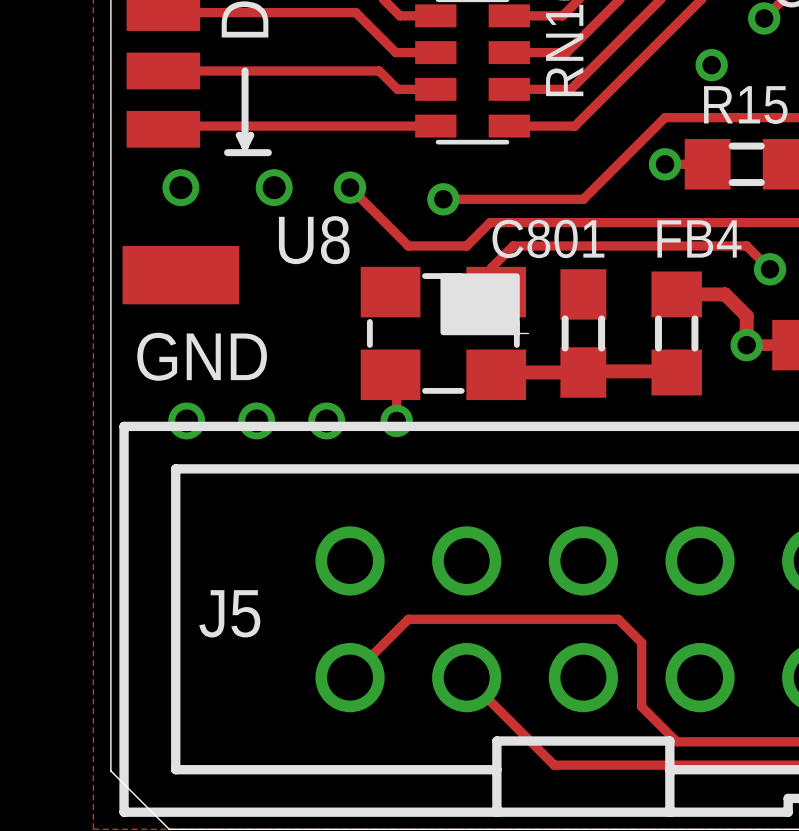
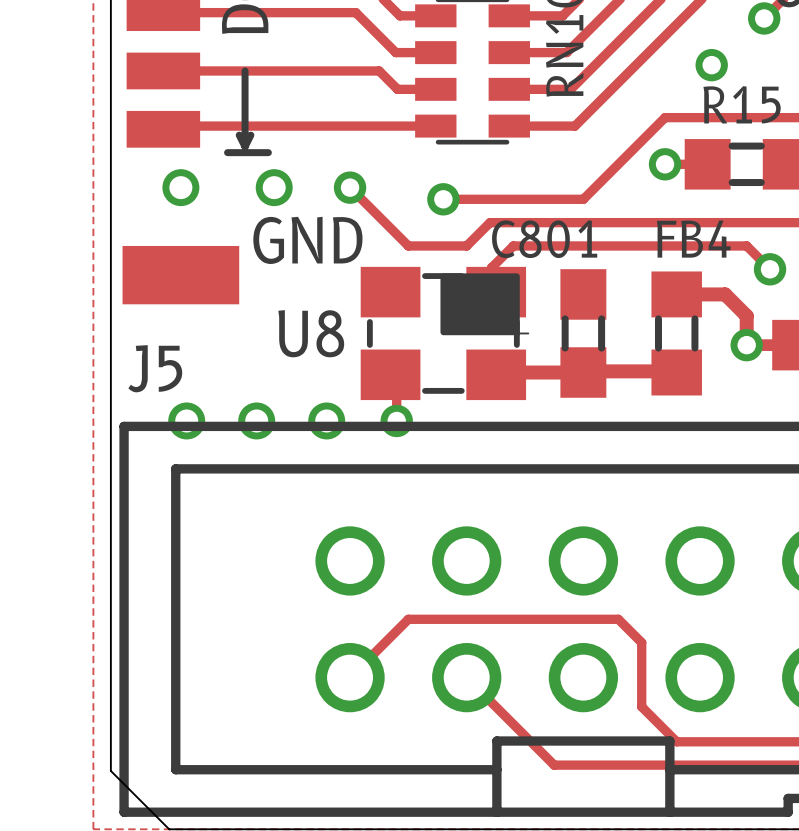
text position: U8 (314, 240) -> U8 (311, 333)
text position: GND (202, 356) -> GND (307, 240)
text position: J5 (229, 613) -> J5 (155, 368)

